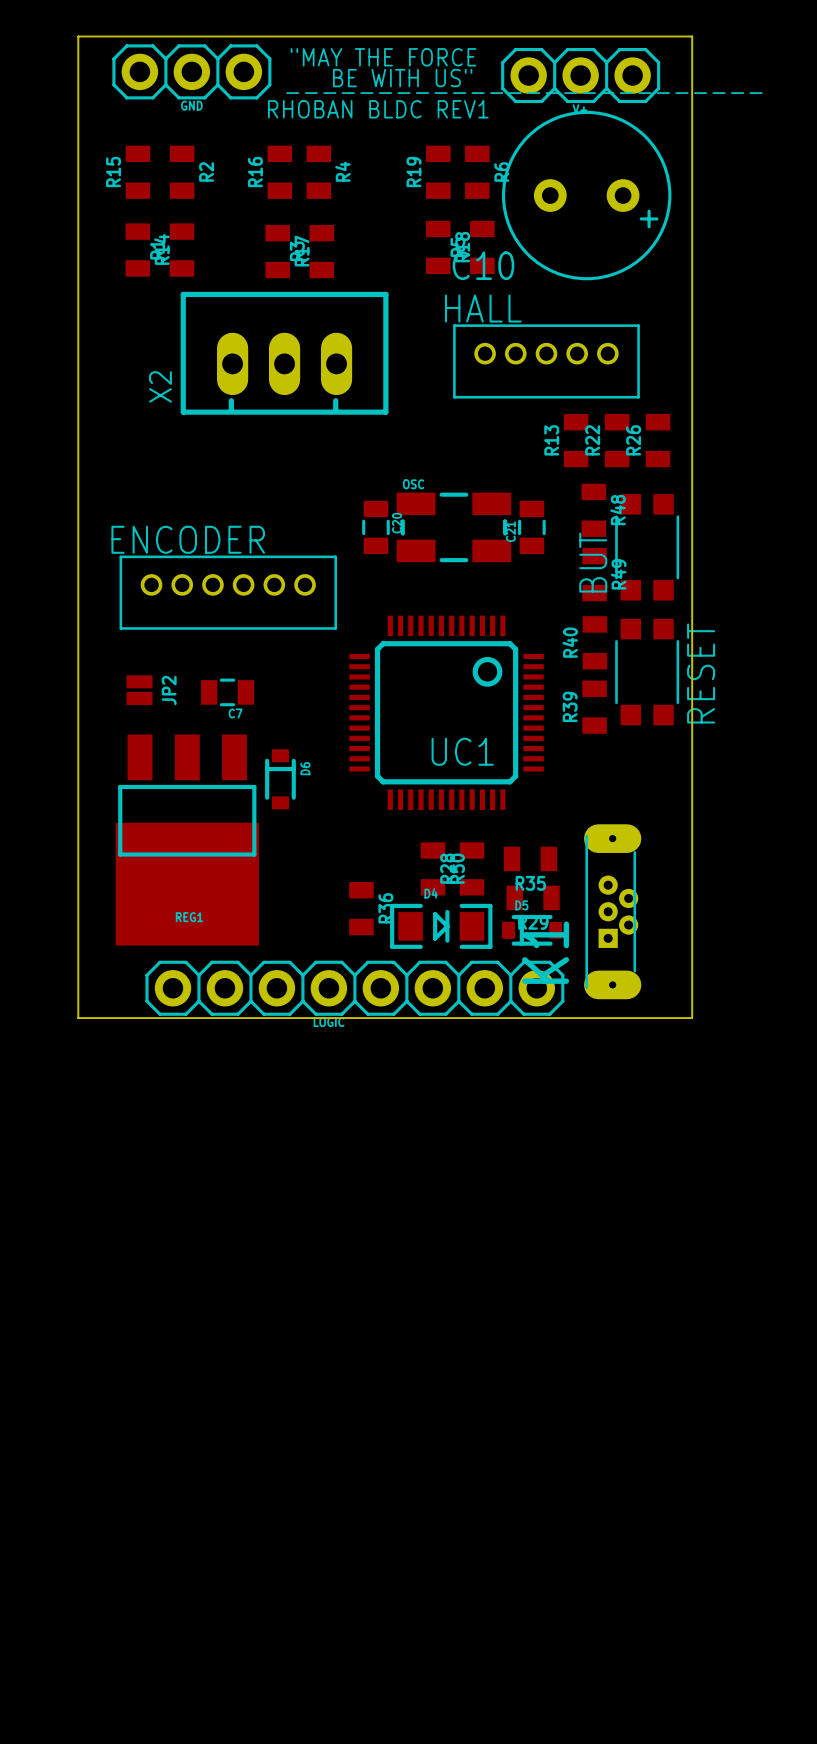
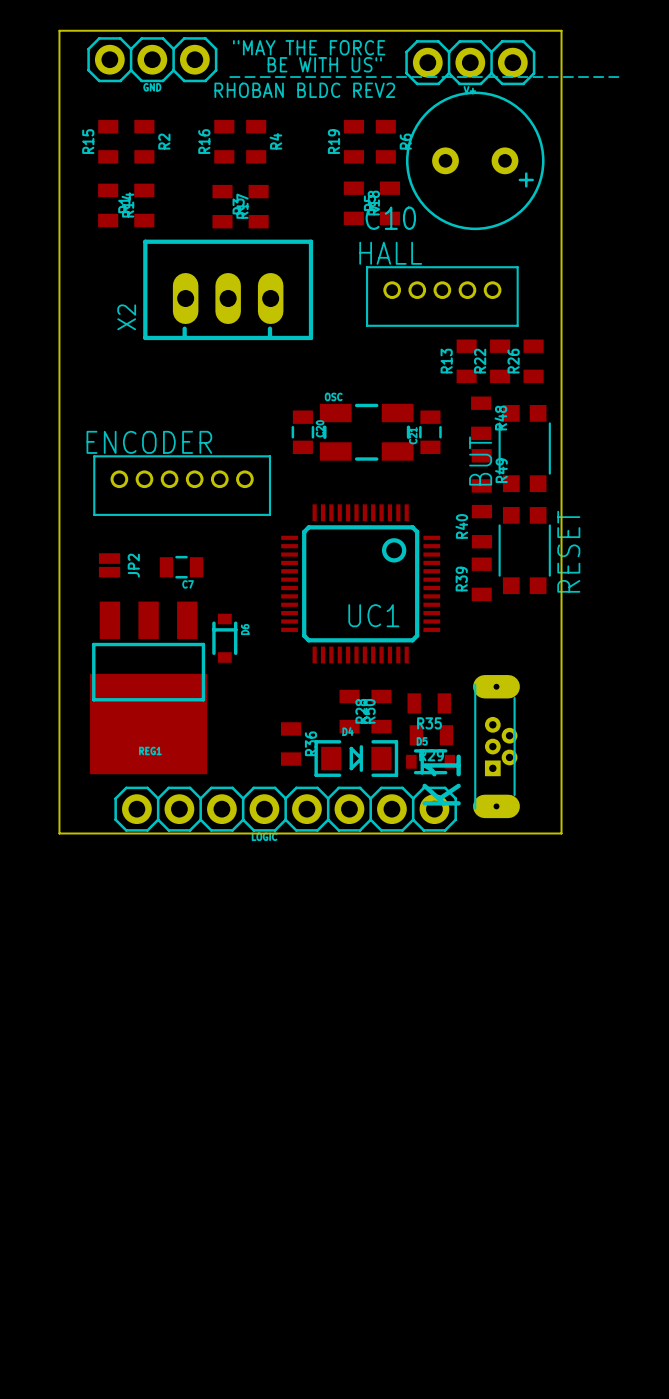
text: RHOBAN BLDC REV1 (378, 109) -> RHOBAN BLDC REV2 (304, 90)

